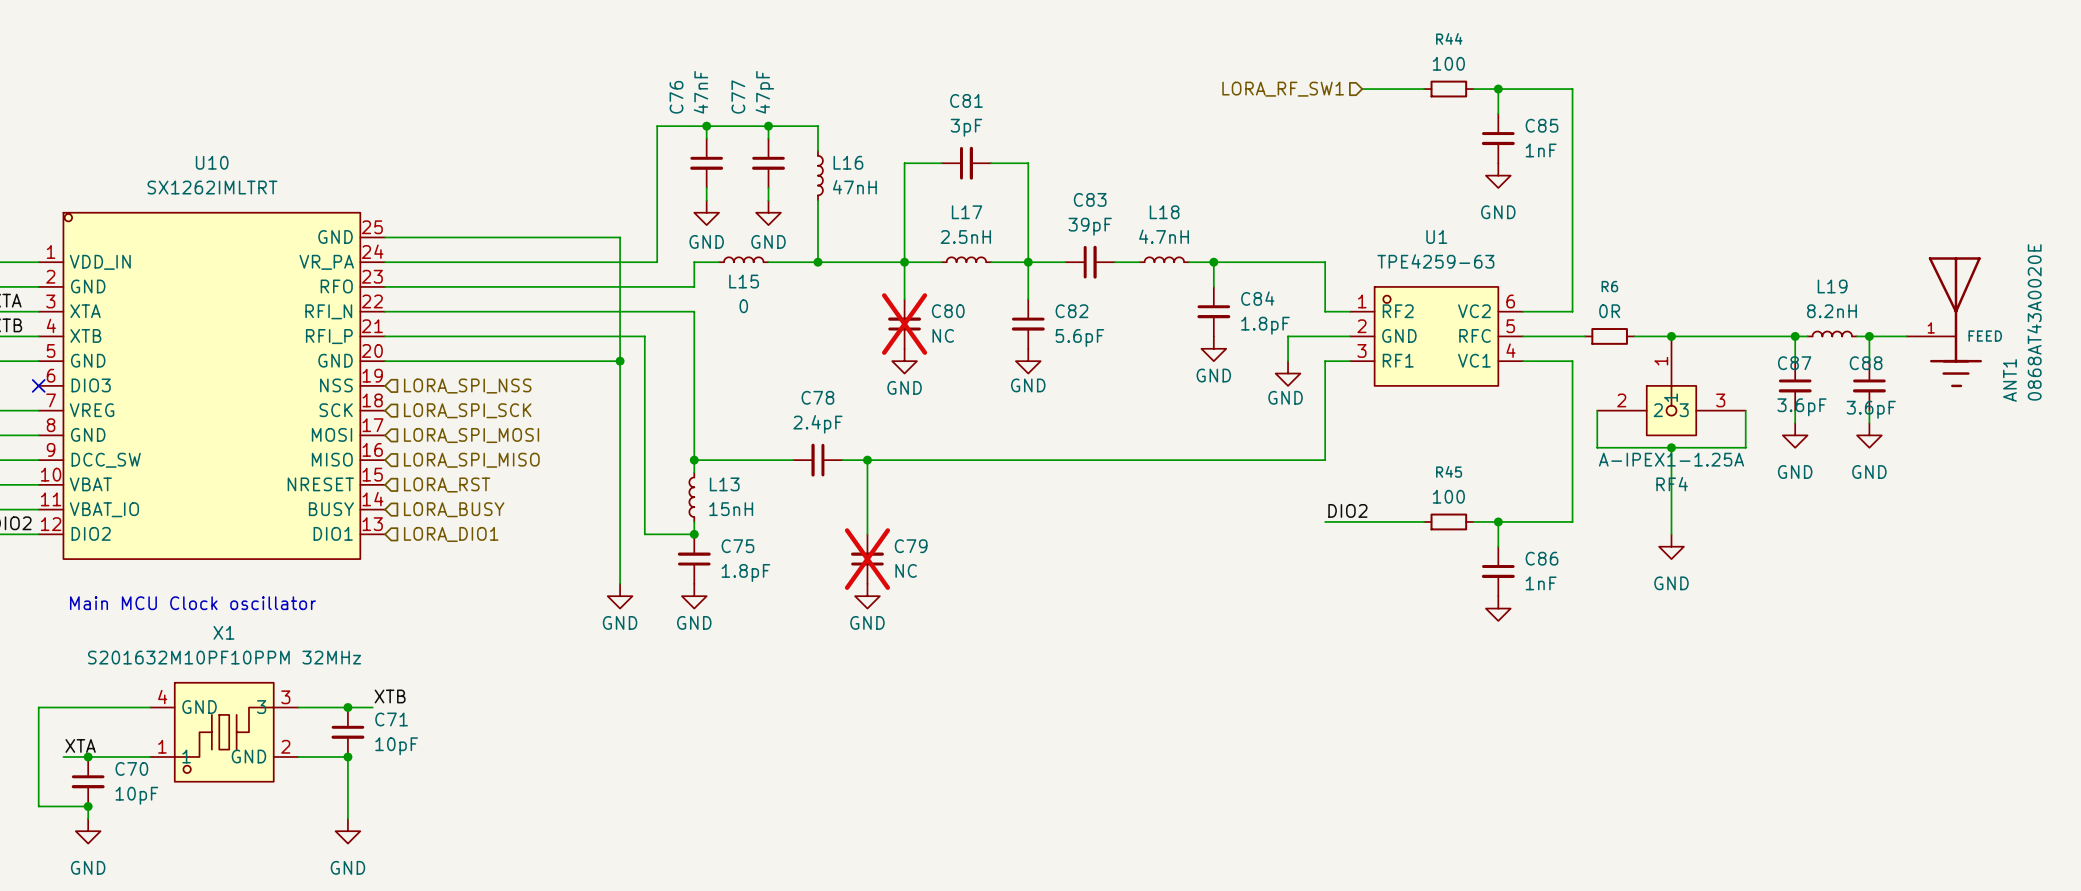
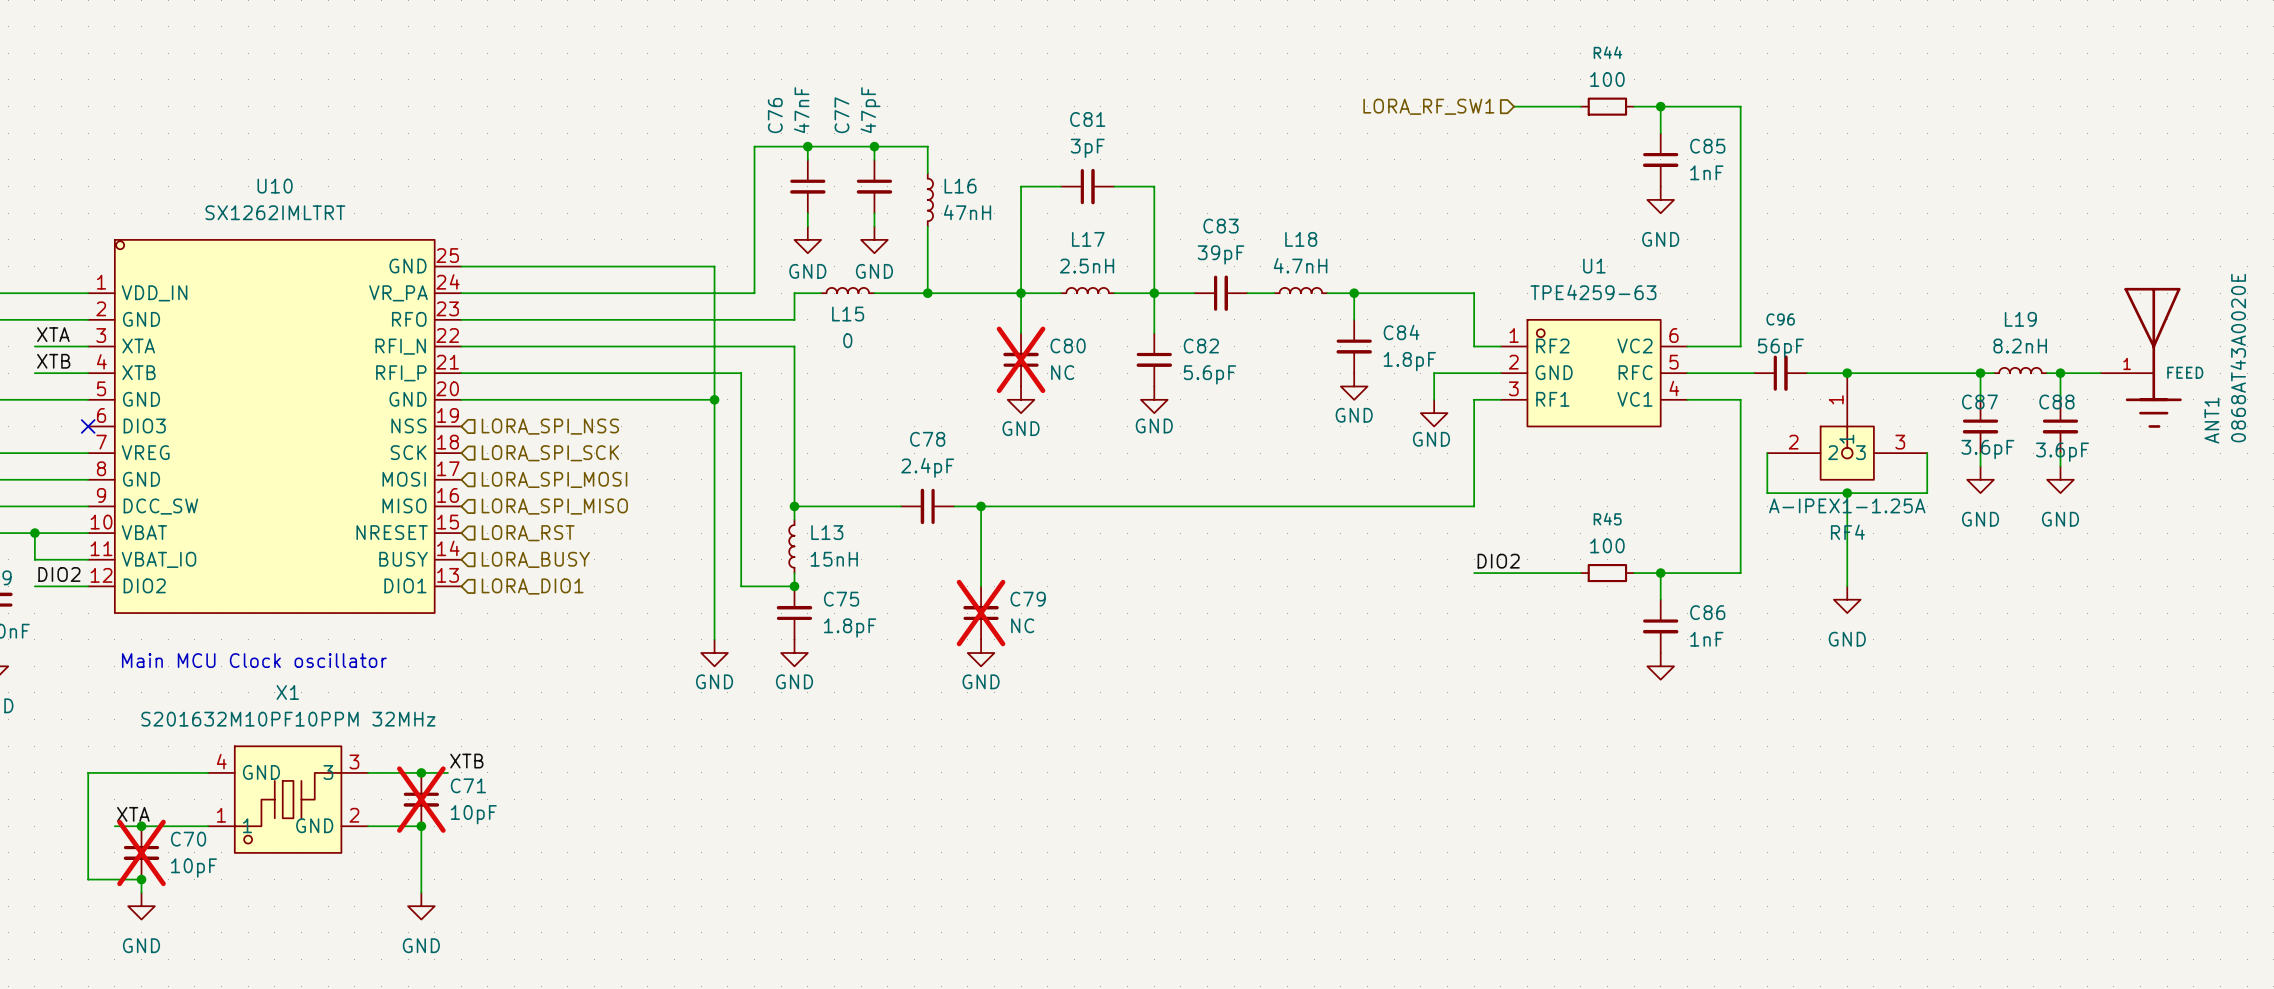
R6: 0R (1609, 336) -> none
C96: none -> 56pF (1780, 373)
C71 do-not-place cross: none -> (421, 799)
C70 do-not-place cross: none -> (141, 852)

